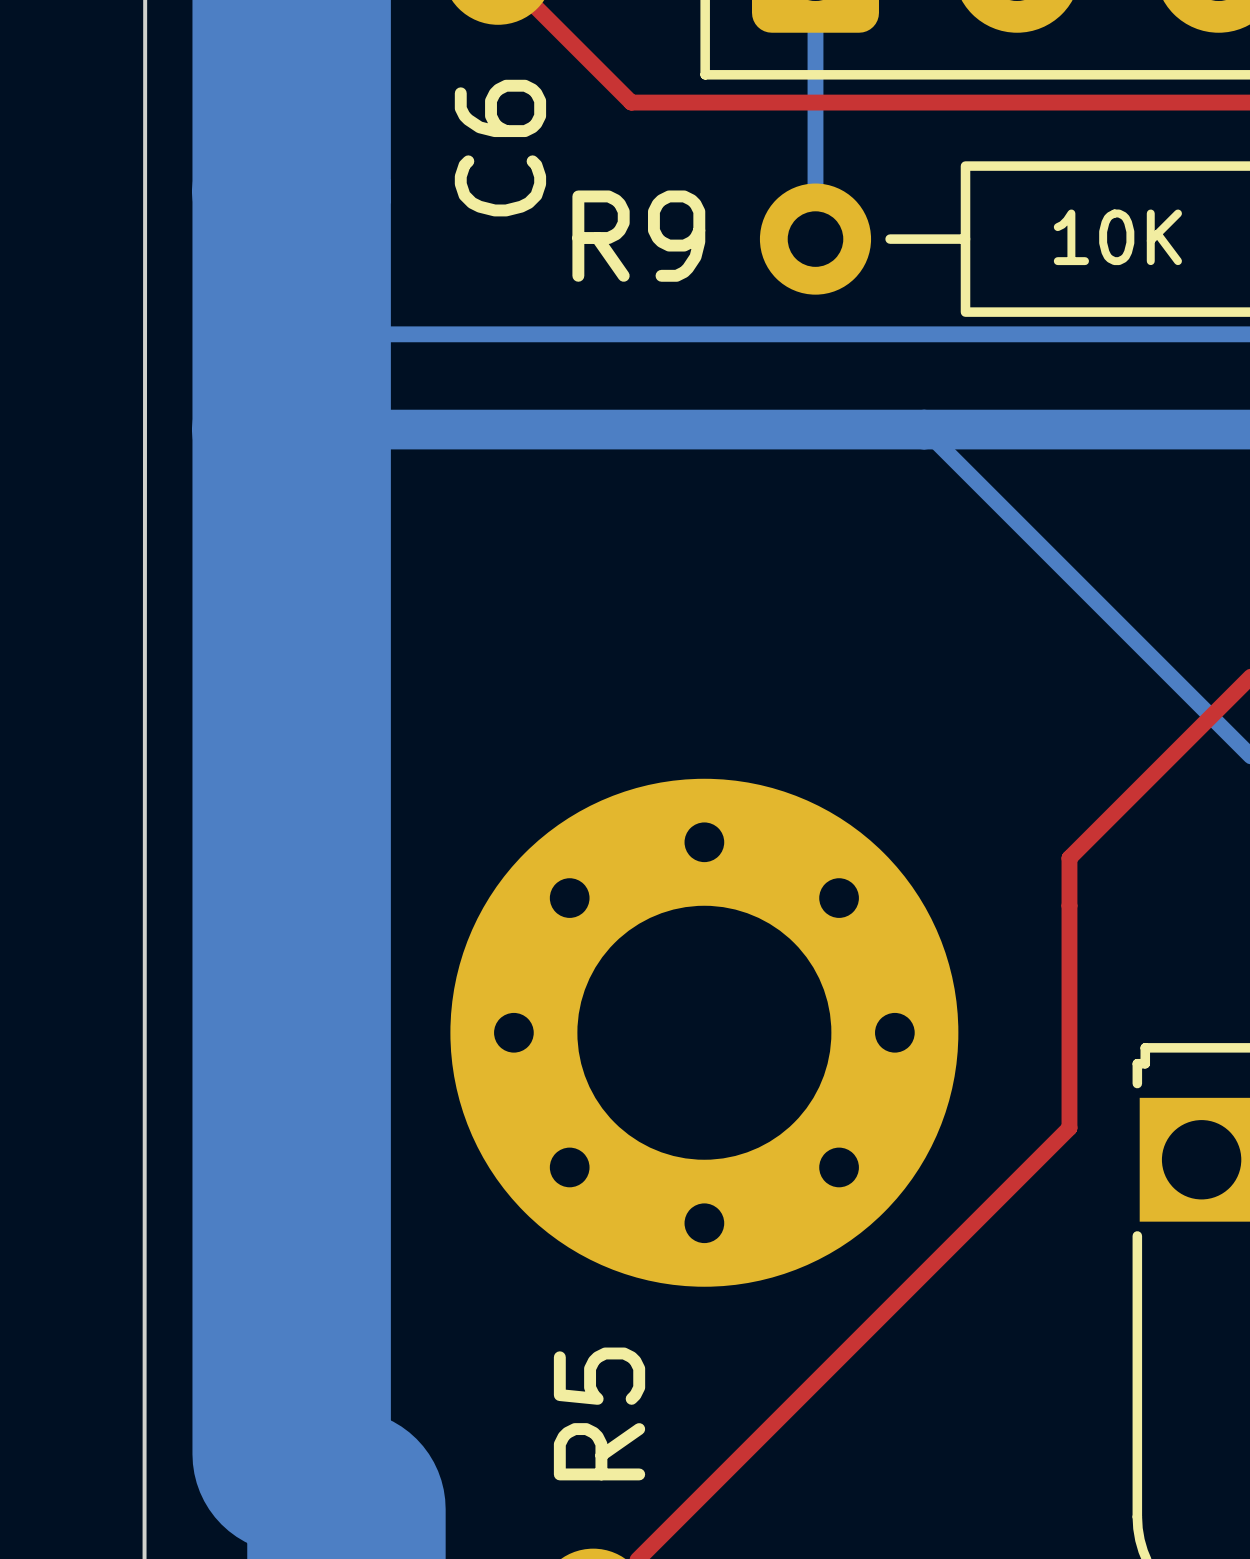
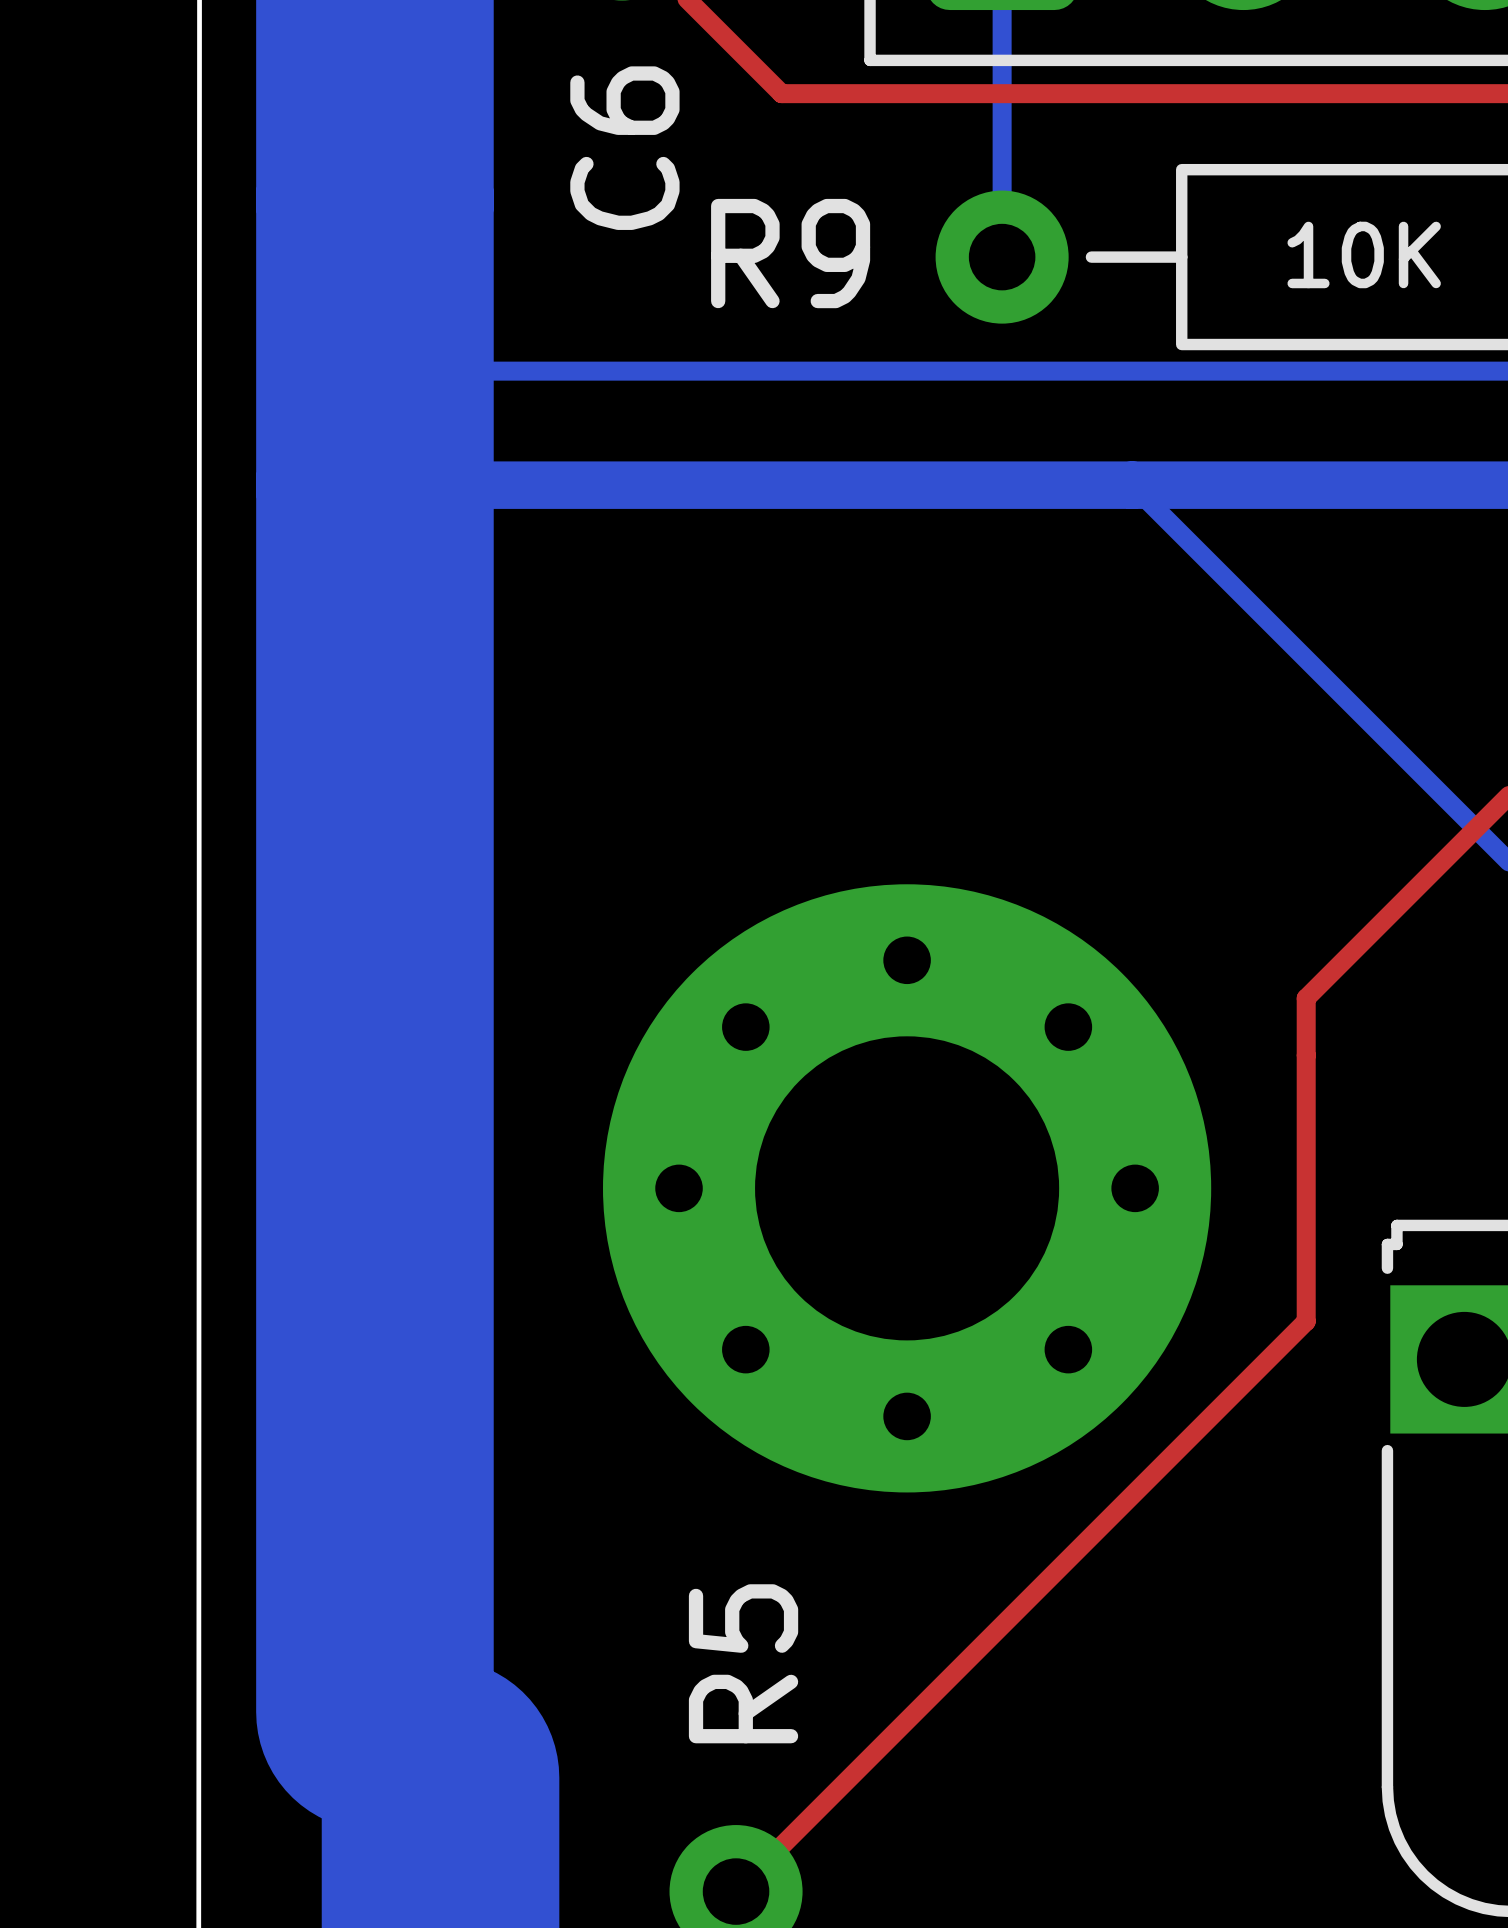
part position: (704, 1032) -> (907, 1188)

